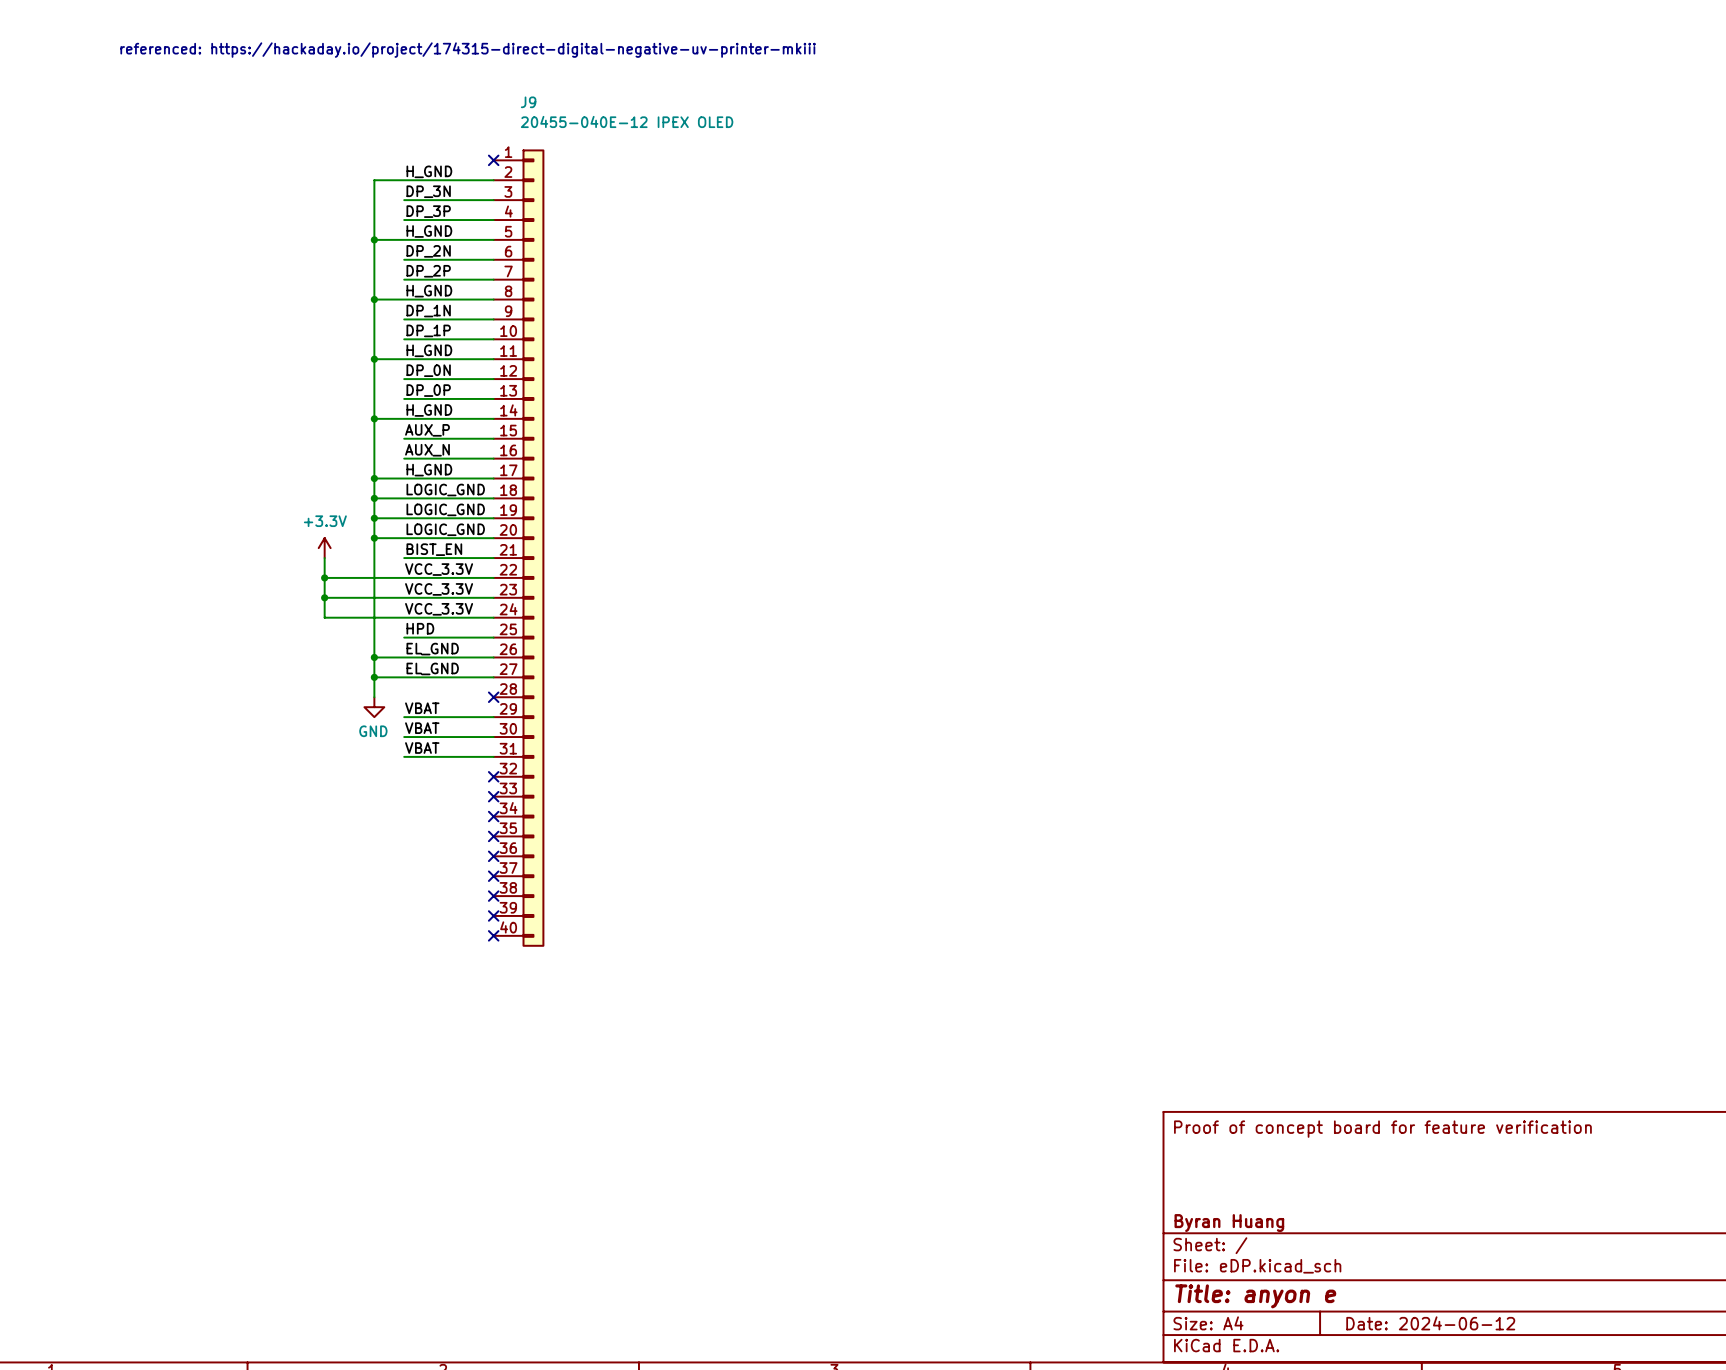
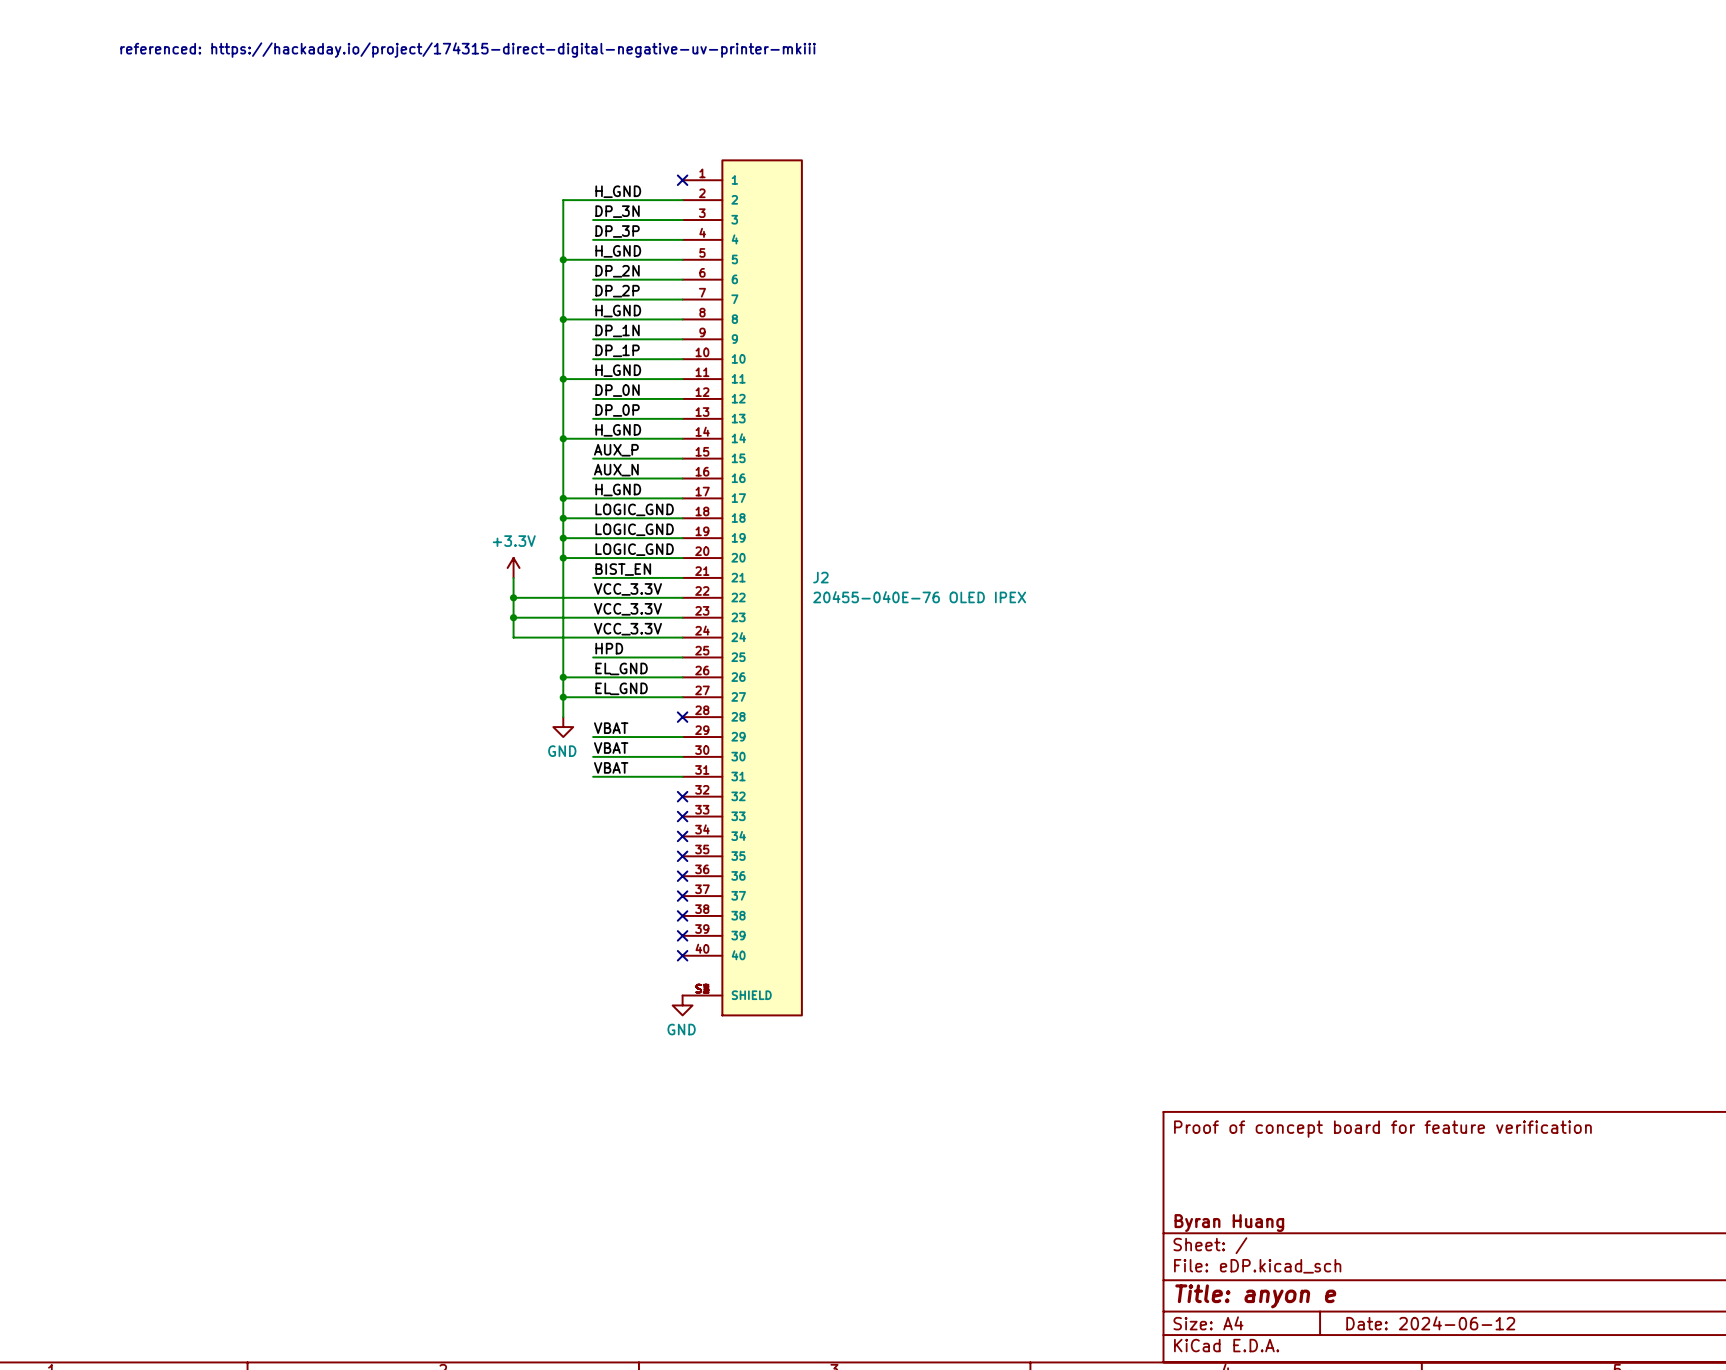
no-connect mark: (493, 160) -> none
label: H_GND (429, 171) -> none
wire: (493, 180) (374, 180) (374, 697) -> (682, 200) (563, 200) (563, 717)
no-connect mark: none -> (682, 180)
label position: DP_3N (428, 191) -> DP_3N (617, 211)
label: none -> H_GND (618, 191)
wire: (404, 200) (493, 200) -> (593, 220) (682, 220)
label position: DP_3P (428, 211) -> DP_3P (617, 231)
wire: (404, 220) (493, 220) -> (593, 239) (682, 239)
label: H_GND (429, 231) -> none
wire: (374, 239) (493, 239) -> (563, 259) (682, 259)
junction: (374, 239) -> none
label position: DP_2N (428, 251) -> DP_2N (617, 271)
label: none -> H_GND (618, 251)
wire: (404, 259) (493, 259) -> (593, 279) (682, 279)
junction: none -> (563, 259)
label position: DP_2P (428, 271) -> DP_2P (617, 291)
wire: (404, 279) (493, 279) -> (593, 299) (682, 299)
label: H_GND (429, 291) -> none
wire: (374, 299) (493, 299) -> (563, 319) (682, 319)
junction: (374, 299) -> none
label position: DP_1N (428, 311) -> DP_1N (617, 330)
label: none -> H_GND (618, 311)
wire: (404, 319) (493, 319) -> (593, 339) (682, 339)
junction: none -> (563, 319)
label position: DP_1P (428, 330) -> DP_1P (617, 350)
wire: (404, 339) (493, 339) -> (593, 359) (682, 359)
label: H_GND (429, 350) -> none
wire: (374, 359) (493, 359) -> (563, 379) (682, 379)
junction: (374, 359) -> none
label position: DP_0N (428, 370) -> DP_0N (617, 390)
label: none -> H_GND (618, 370)
wire: (404, 379) (493, 379) -> (593, 398) (682, 398)
junction: none -> (563, 379)
label position: DP_0P (428, 390) -> DP_0P (617, 410)
wire: (404, 398) (493, 398) -> (593, 418) (682, 418)
label: H_GND (429, 410) -> none
wire: (374, 418) (493, 418) -> (563, 438) (682, 438)
junction: (374, 418) -> none
label position: AUX_P (427, 430) -> AUX_P (616, 450)
label: none -> H_GND (618, 430)
wire: (404, 438) (493, 438) -> (593, 458) (682, 458)
junction: none -> (563, 438)
label position: AUX_N (427, 450) -> AUX_N (616, 470)
wire: (404, 458) (493, 458) -> (593, 478) (682, 478)
label: H_GND (429, 470) -> none
wire: (374, 478) (493, 478) -> (563, 498) (682, 498)
junction: (374, 478) -> none
label: LOGIC_GND (445, 490) -> none
label: none -> H_GND (618, 490)
wire: (374, 498) (493, 498) -> (563, 518) (682, 518)
junction: (374, 498) -> none
junction: none -> (563, 498)
label: LOGIC_GND (445, 509) -> none
label: none -> LOGIC_GND (634, 509)
wire: (374, 518) (493, 518) -> (563, 538) (682, 538)
junction: (374, 518) -> none
junction: none -> (563, 518)
label: LOGIC_GND (445, 529) -> none
label: none -> LOGIC_GND (634, 529)
wire: (374, 538) (493, 538) -> (563, 558) (682, 558)
junction: (374, 538) -> none
junction: none -> (563, 538)
power symbol position: +3.3V (324, 548) -> +3.3V (513, 567)
J9: 20455-040E-12 IPEX OLED (519, 548) -> none
label position: BIST_EN (434, 549) -> BIST_EN (623, 569)
label: none -> LOGIC_GND (634, 549)
wire: (324, 558) (324, 617) (493, 617) -> (513, 577) (513, 637) (682, 637)
wire: (404, 558) (493, 558) -> (593, 577) (682, 577)
junction: none -> (563, 558)
label: VCC_3.3V (439, 569) -> none
wire: (324, 577) (493, 577) -> (513, 597) (682, 597)
junction: (324, 577) -> none
J2: none -> 20455-040E-76 OLED IPEX (742, 587)
label: VCC_3.3V (439, 589) -> none
label: none -> VCC_3.3V (627, 589)
wire: (324, 597) (493, 597) -> (513, 617) (682, 617)
junction: (324, 597) -> none
junction: none -> (513, 597)
label: VCC_3.3V (439, 609) -> none
label: none -> VCC_3.3V (627, 609)
junction: none -> (513, 617)
label position: HPD (420, 628) -> HPD (609, 648)
label: none -> VCC_3.3V (627, 629)
wire: (404, 637) (493, 637) -> (593, 657) (682, 657)
label: EL_GND (432, 649) -> none
wire: (374, 657) (493, 657) -> (563, 677) (682, 677)
junction: (374, 657) -> none
label: EL_GND (432, 668) -> none
label: none -> EL_GND (621, 668)
wire: (374, 677) (493, 677) -> (563, 697) (682, 697)
junction: (374, 677) -> none
junction: none -> (563, 677)
label: none -> EL_GND (621, 688)
no-connect mark: (493, 697) -> none
junction: none -> (563, 697)
power symbol position: GND (374, 707) -> GND (563, 727)
label: VBAT (422, 708) -> none
wire: (404, 717) (493, 717) -> (593, 737) (682, 737)
no-connect mark: none -> (682, 717)
label: VBAT (422, 728) -> none
label: none -> VBAT (611, 728)
wire: (404, 737) (493, 737) -> (593, 756) (682, 756)
label: VBAT (422, 748) -> none
label: none -> VBAT (611, 748)
wire: (404, 756) (493, 756) -> (593, 776) (682, 776)
label: none -> VBAT (611, 767)
no-connect mark: (493, 776) -> none
no-connect mark: (493, 796) -> none
no-connect mark: none -> (682, 796)
no-connect mark: (493, 816) -> none
no-connect mark: none -> (682, 816)
no-connect mark: (493, 836) -> none
no-connect mark: none -> (682, 836)
no-connect mark: (493, 856) -> none
no-connect mark: none -> (682, 856)
no-connect mark: (493, 876) -> none
no-connect mark: none -> (682, 876)
no-connect mark: (493, 896) -> none
no-connect mark: none -> (682, 896)
no-connect mark: (493, 915) -> none
no-connect mark: none -> (682, 915)
no-connect mark: (493, 935) -> none
no-connect mark: none -> (682, 935)
no-connect mark: none -> (682, 955)
power symbol: none -> GND (682, 1005)

